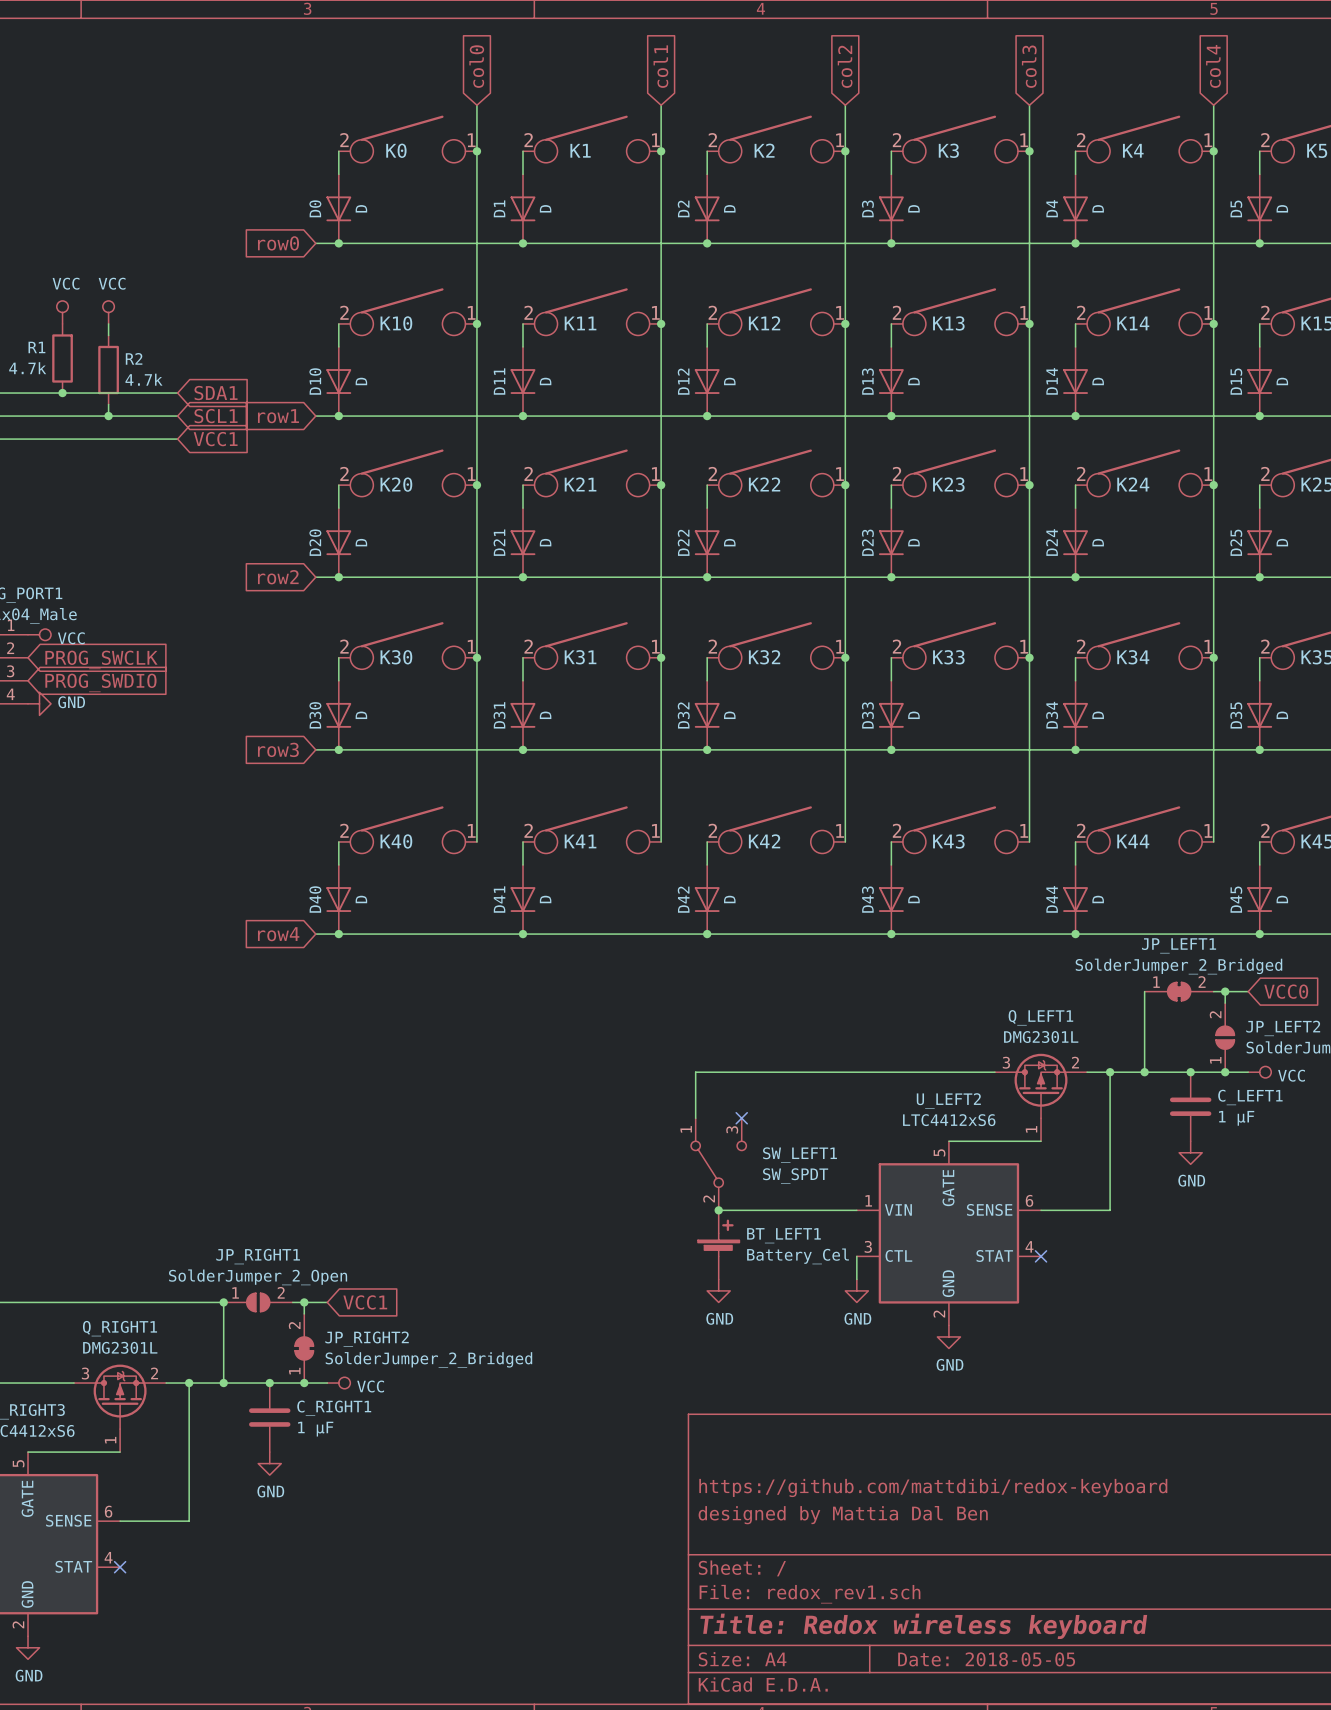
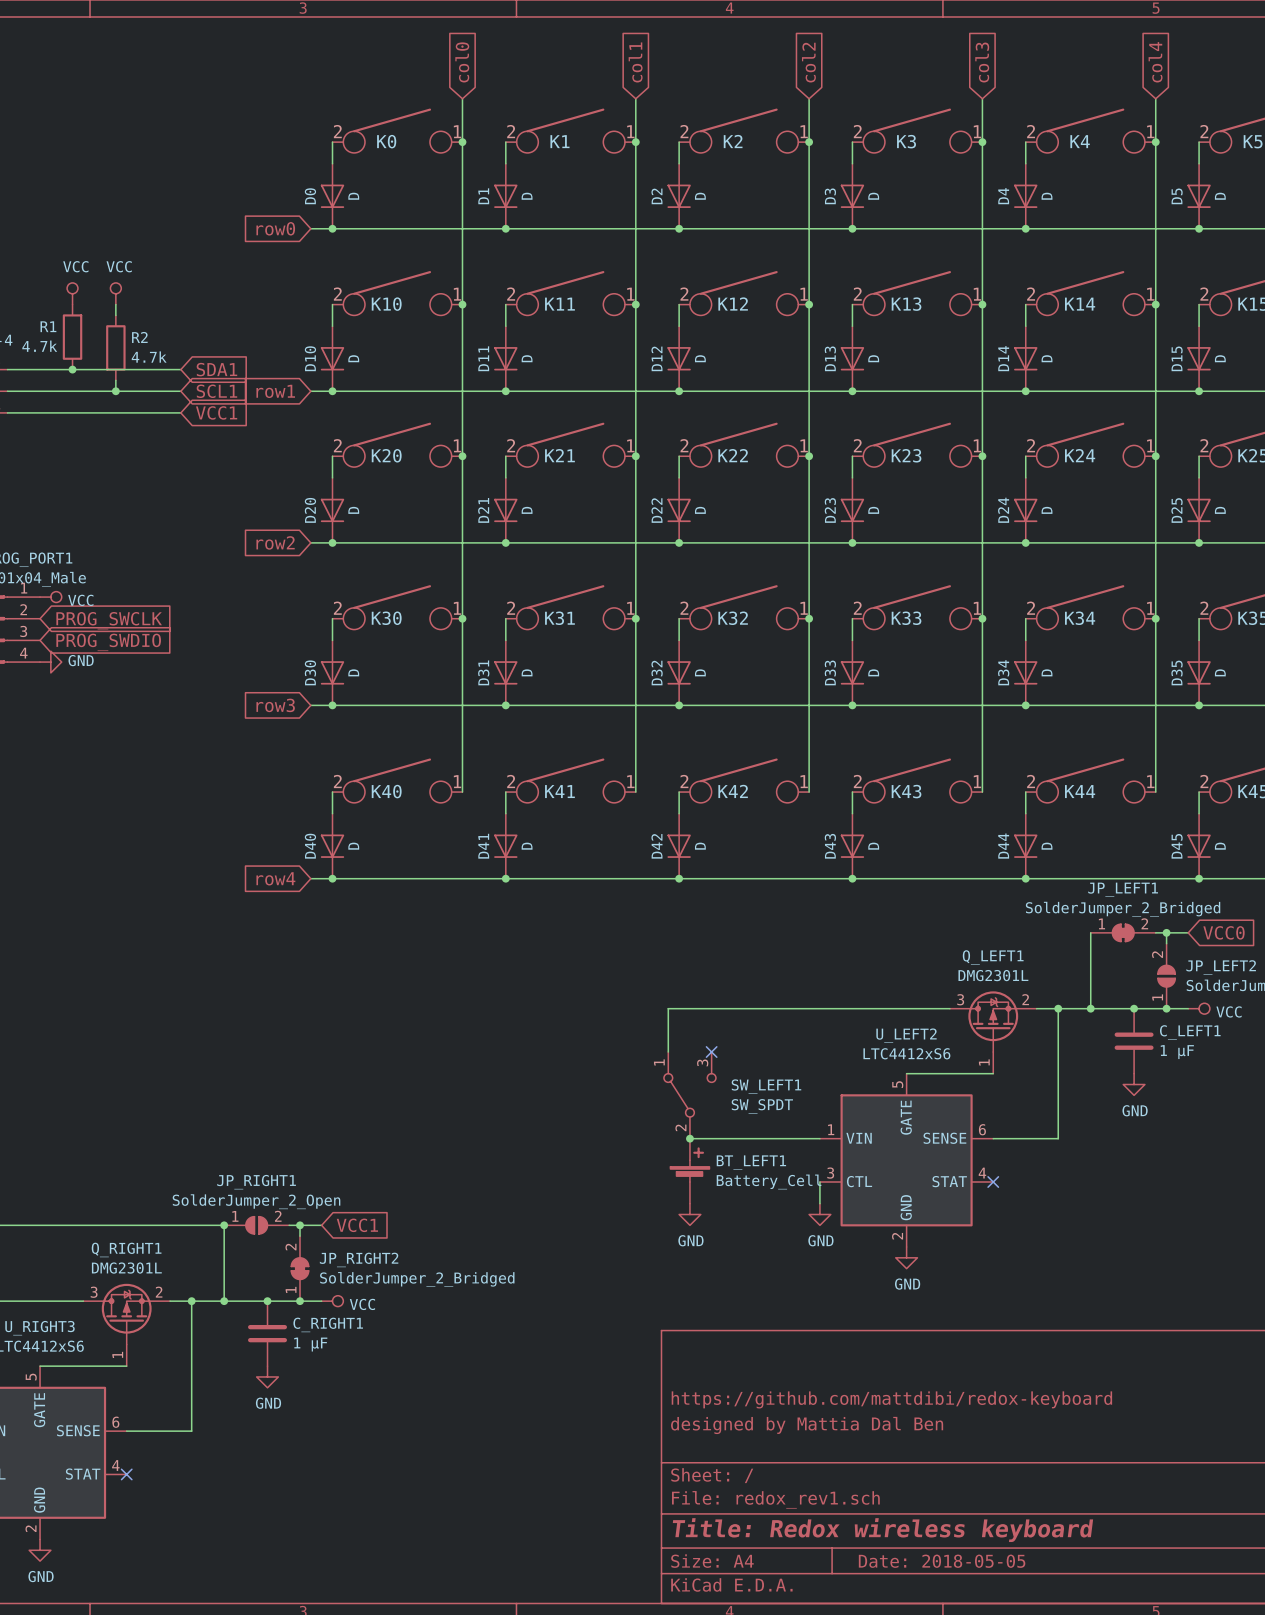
BT_LEFT1 value: Battery_Cel (798, 1256) -> Battery_Cell (769, 1181)

